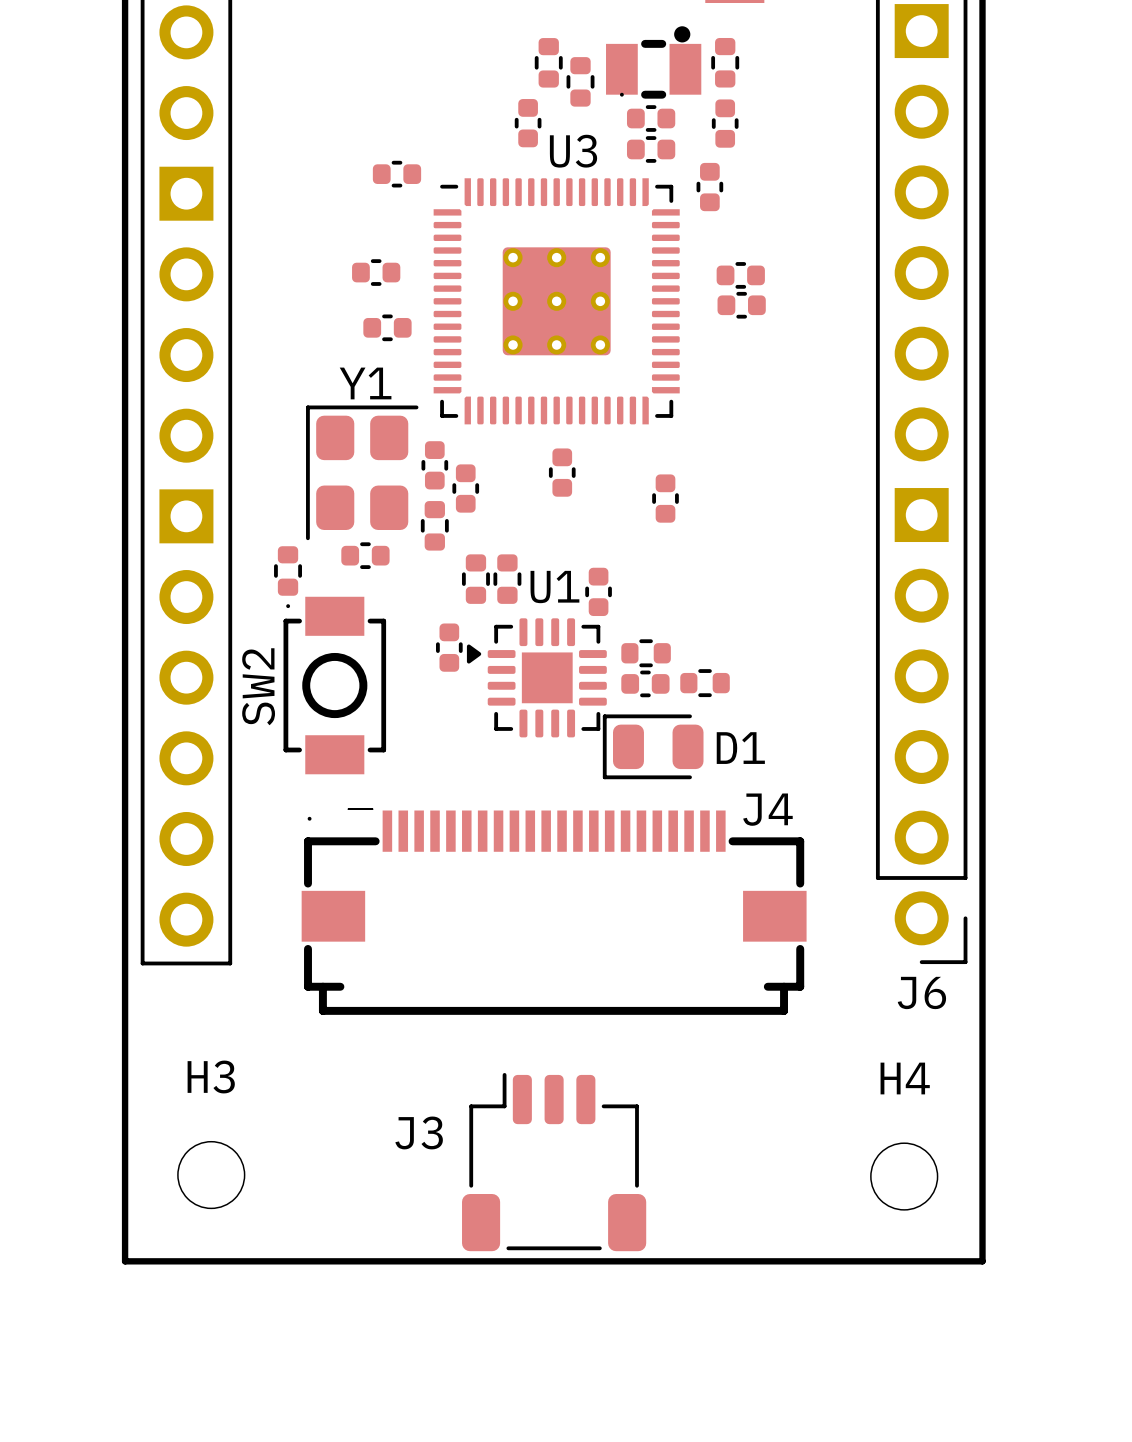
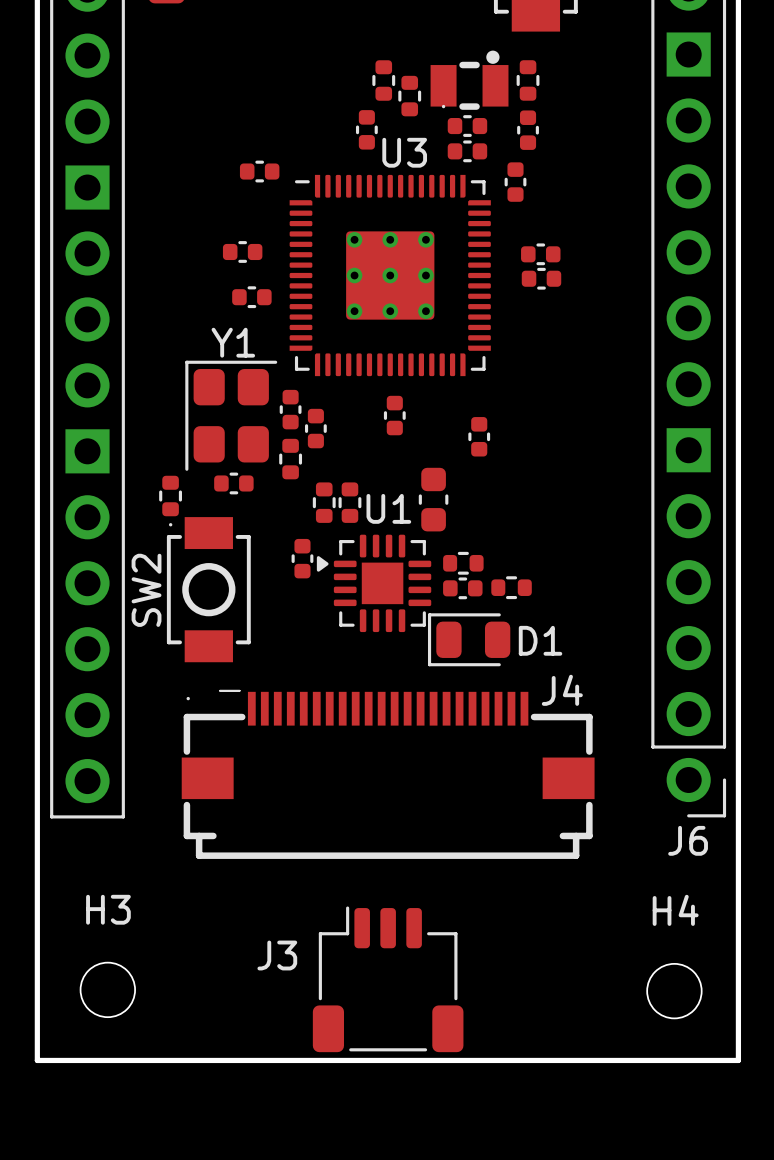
part footprint: [585, 567, 612, 617] -> [418, 467, 449, 532]

